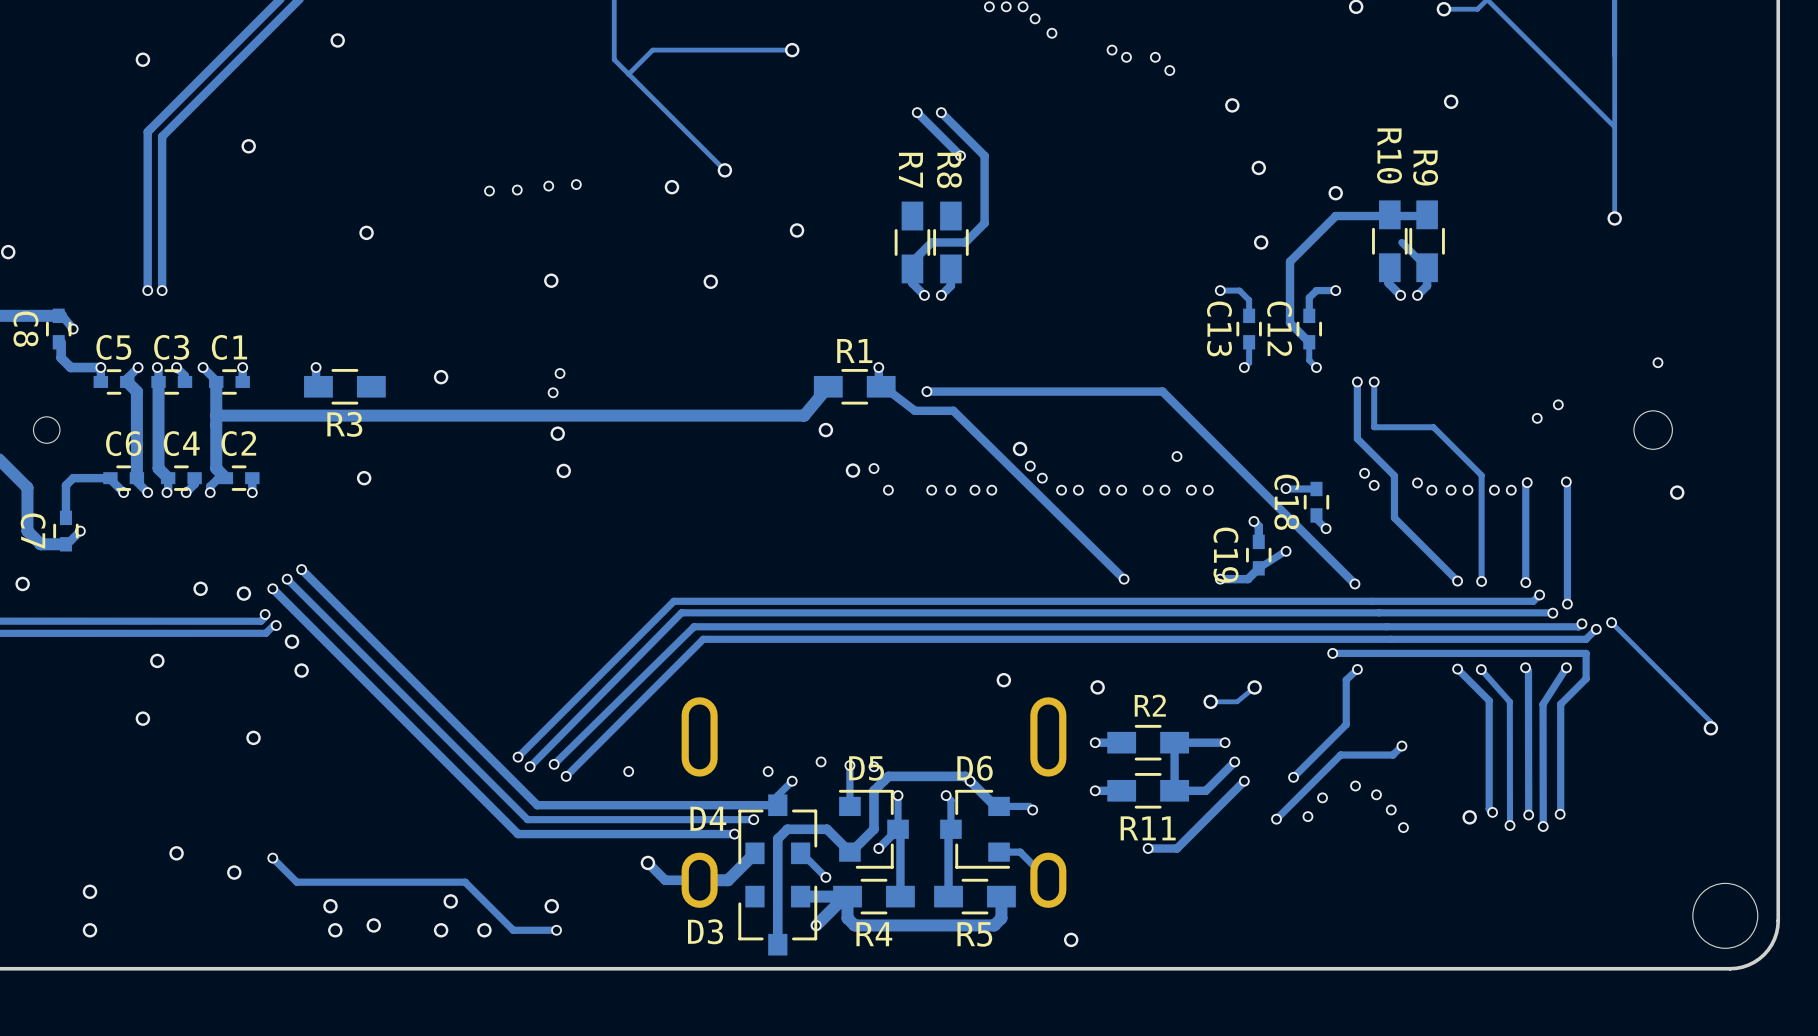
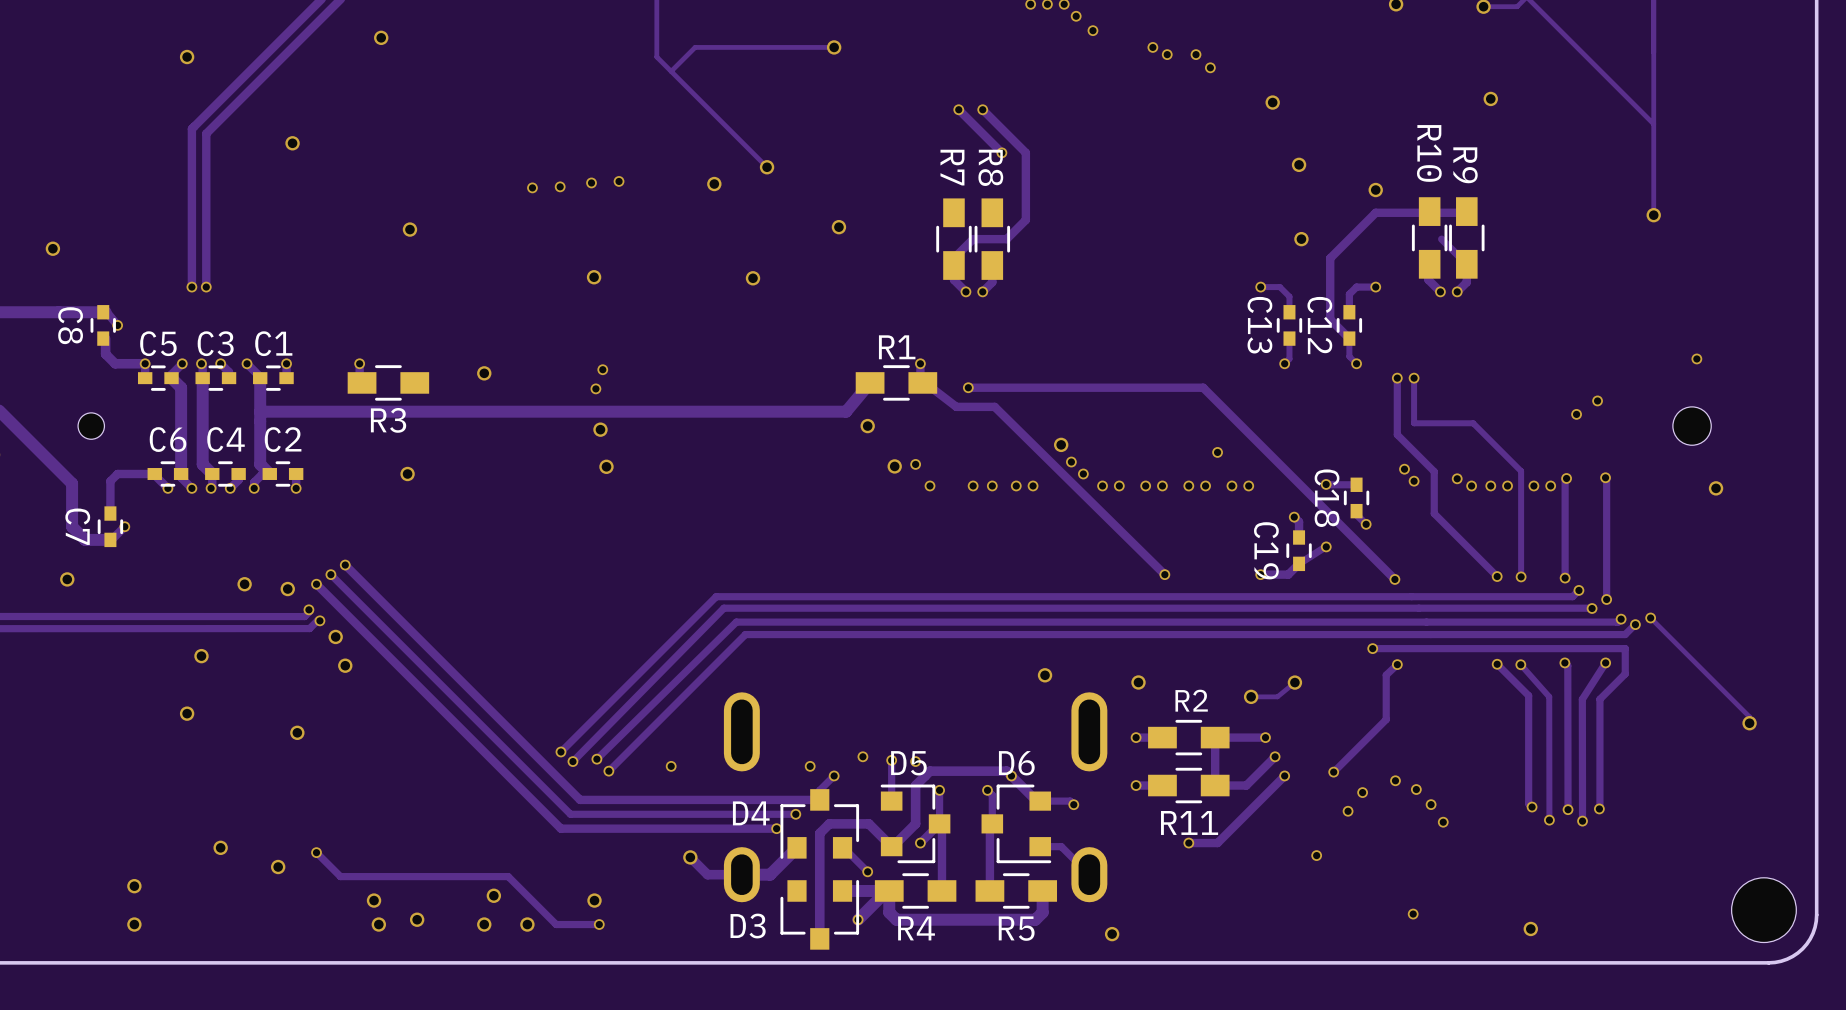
track: (1401, 746) (1392, 755) (1340, 755) (1276, 819) -> none
via: (1401, 746) -> none
via position: (1469, 817) -> (1530, 928)
via position: (1276, 819) -> (1316, 855)
via: none -> (1413, 914)

